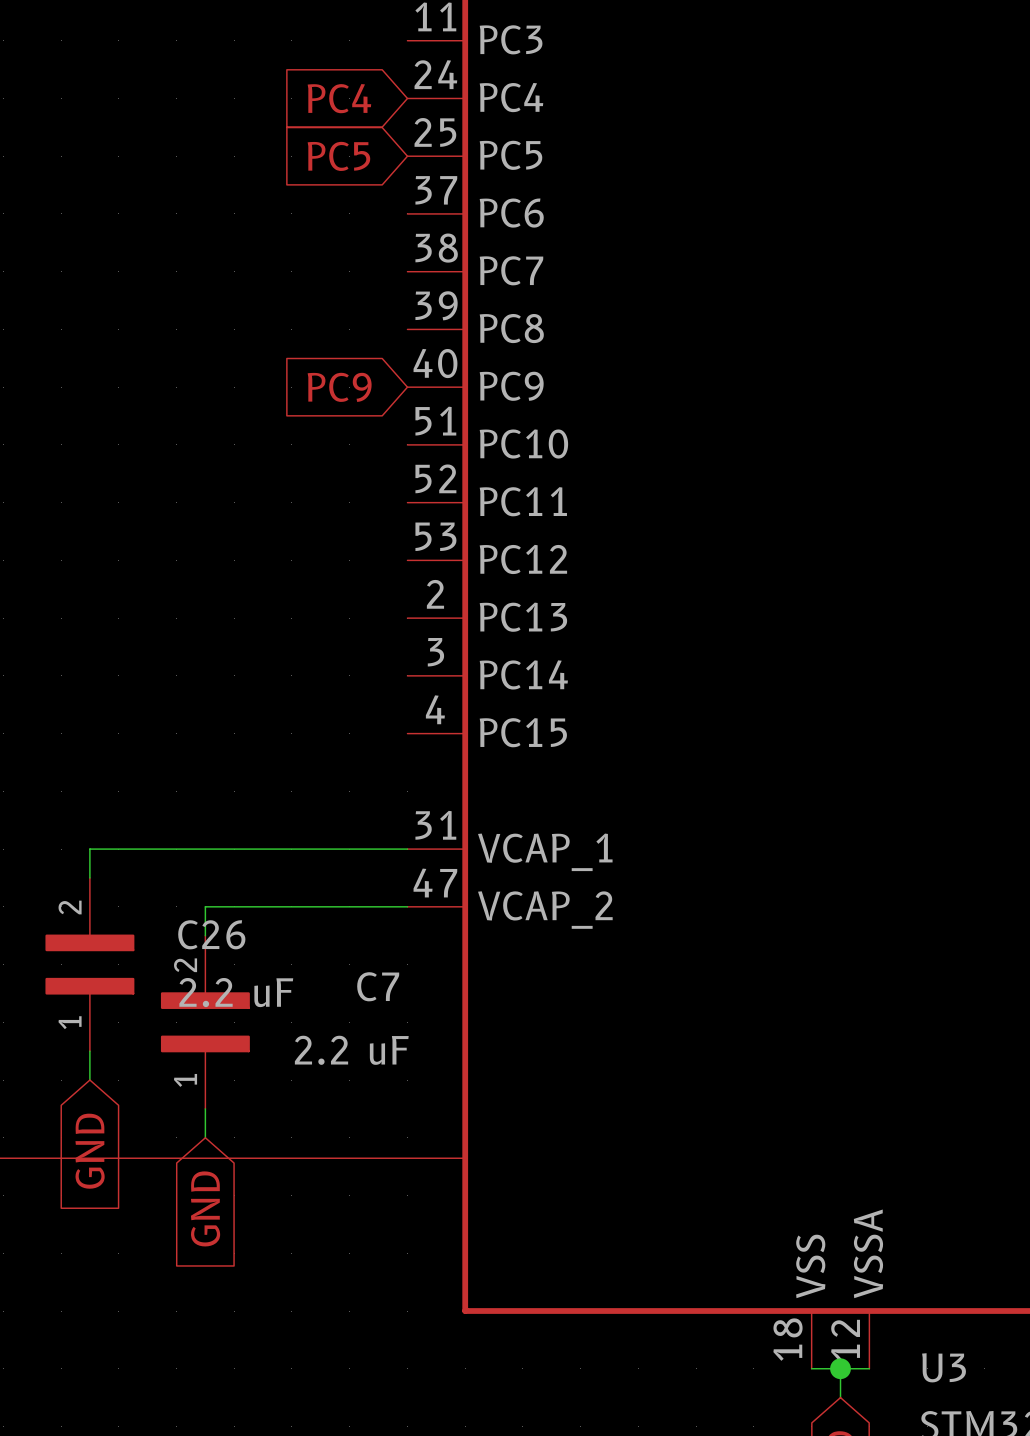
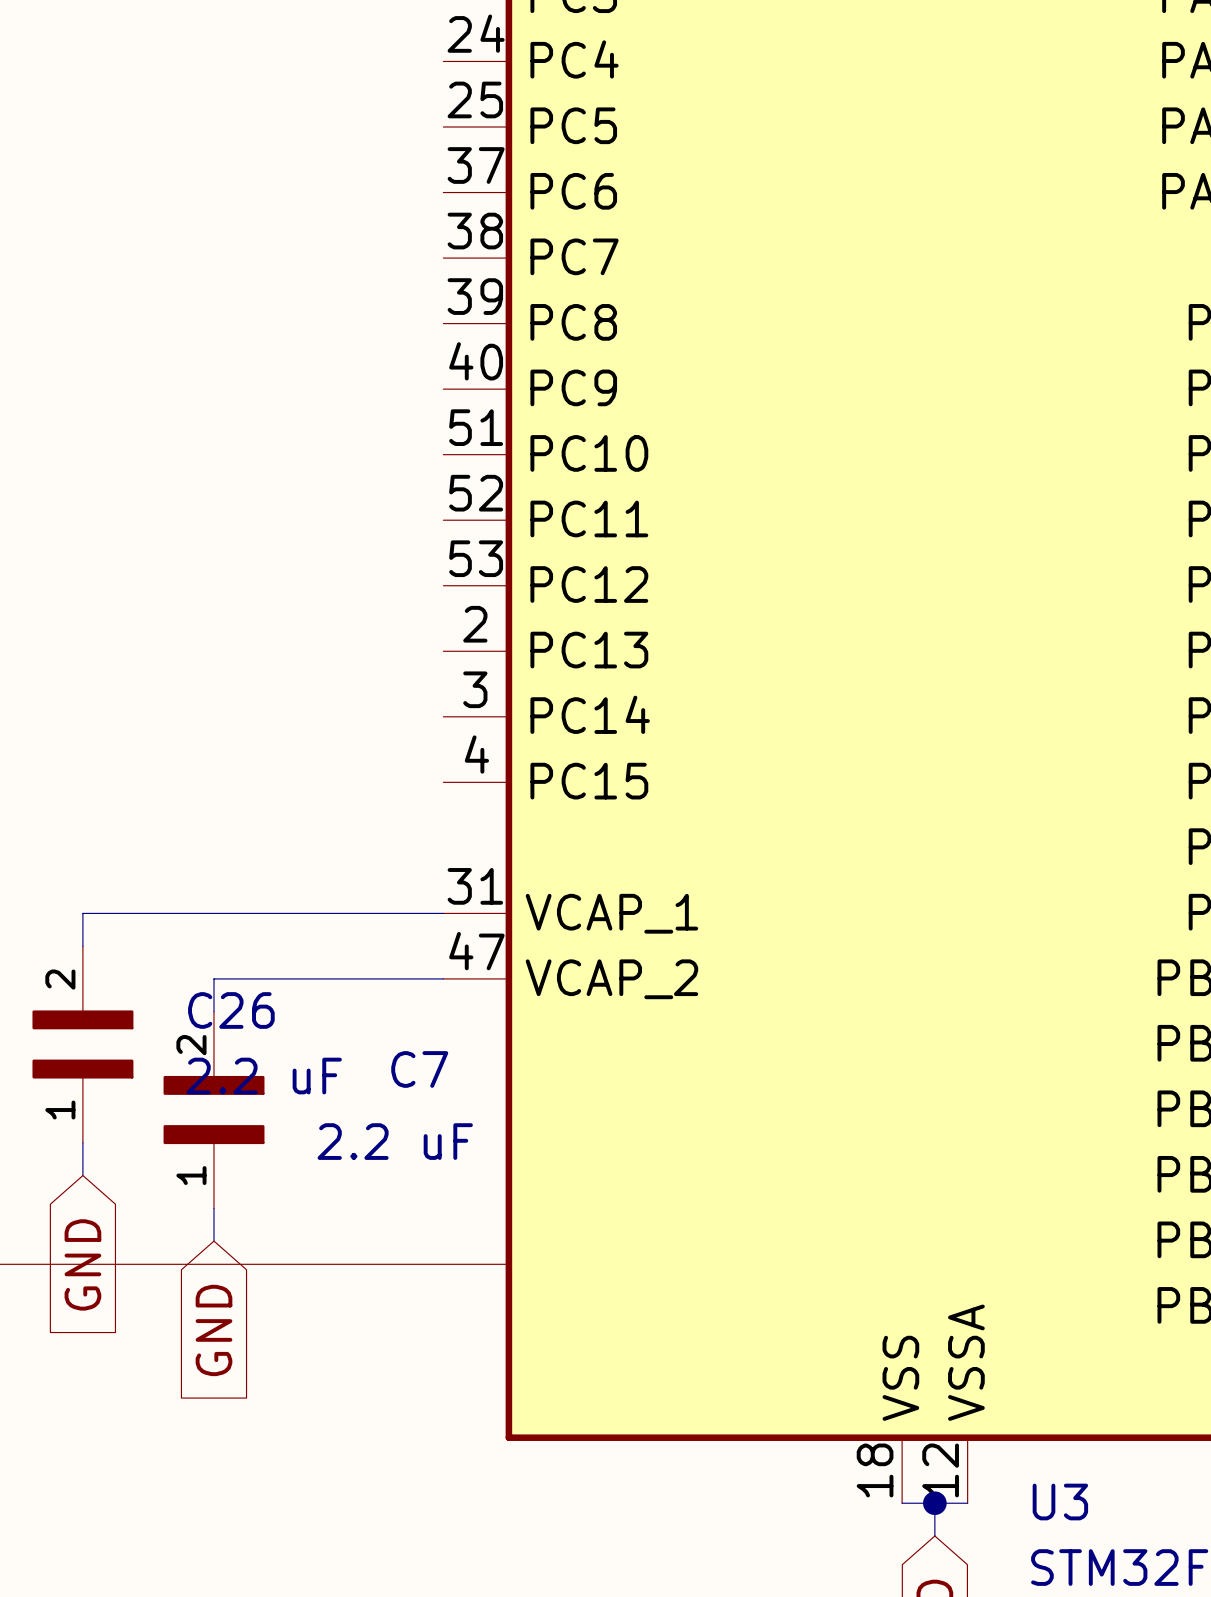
global label: PC4 (339, 98) -> none
global label: PC5 (338, 156) -> none
global label: PC9 (339, 387) -> none

